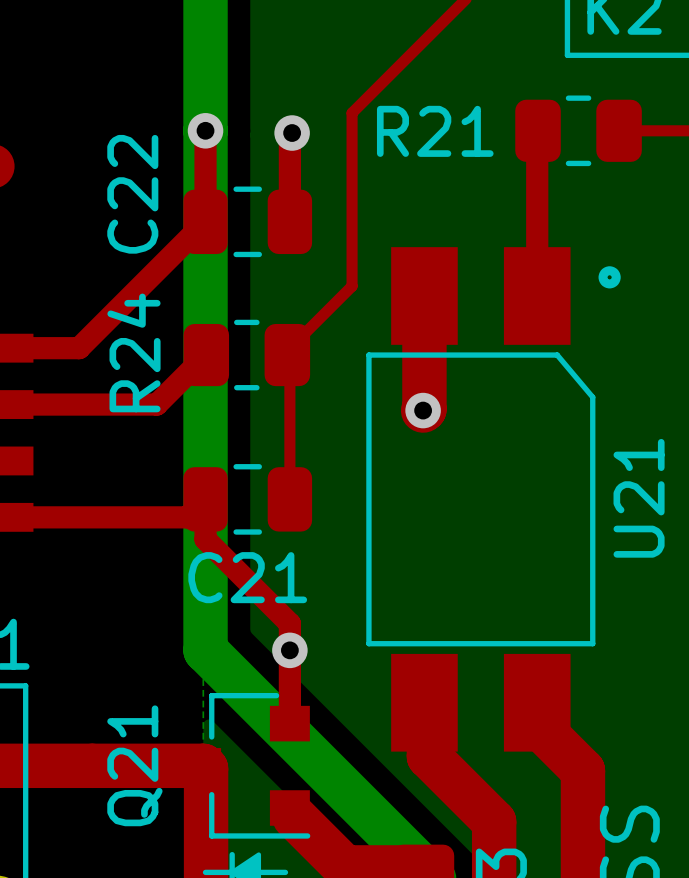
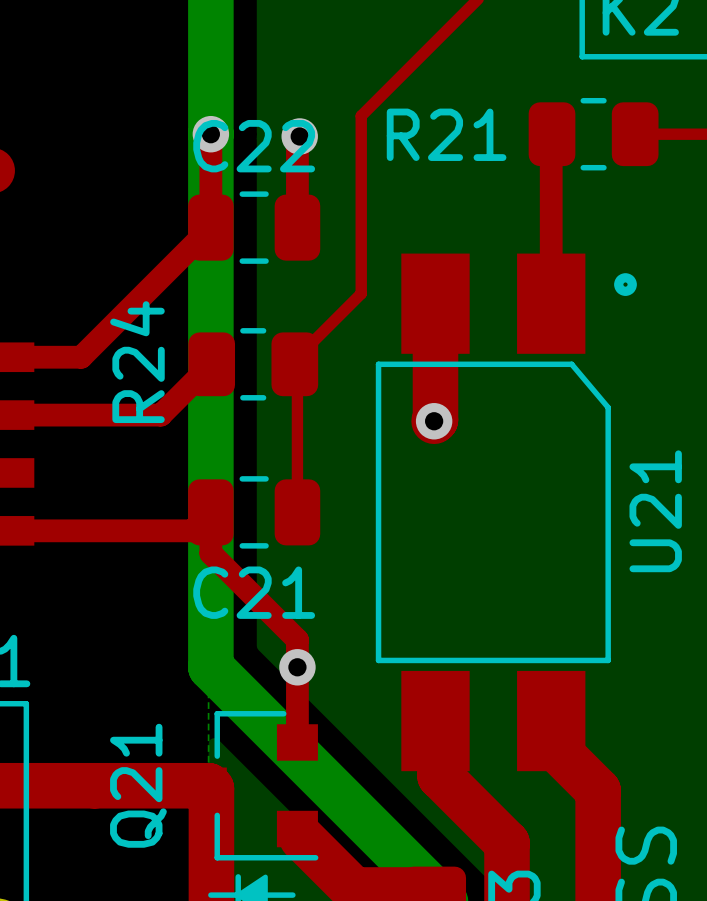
C22 name rotation: 0° (132, 194) -> 90° clockwise (254, 146)

